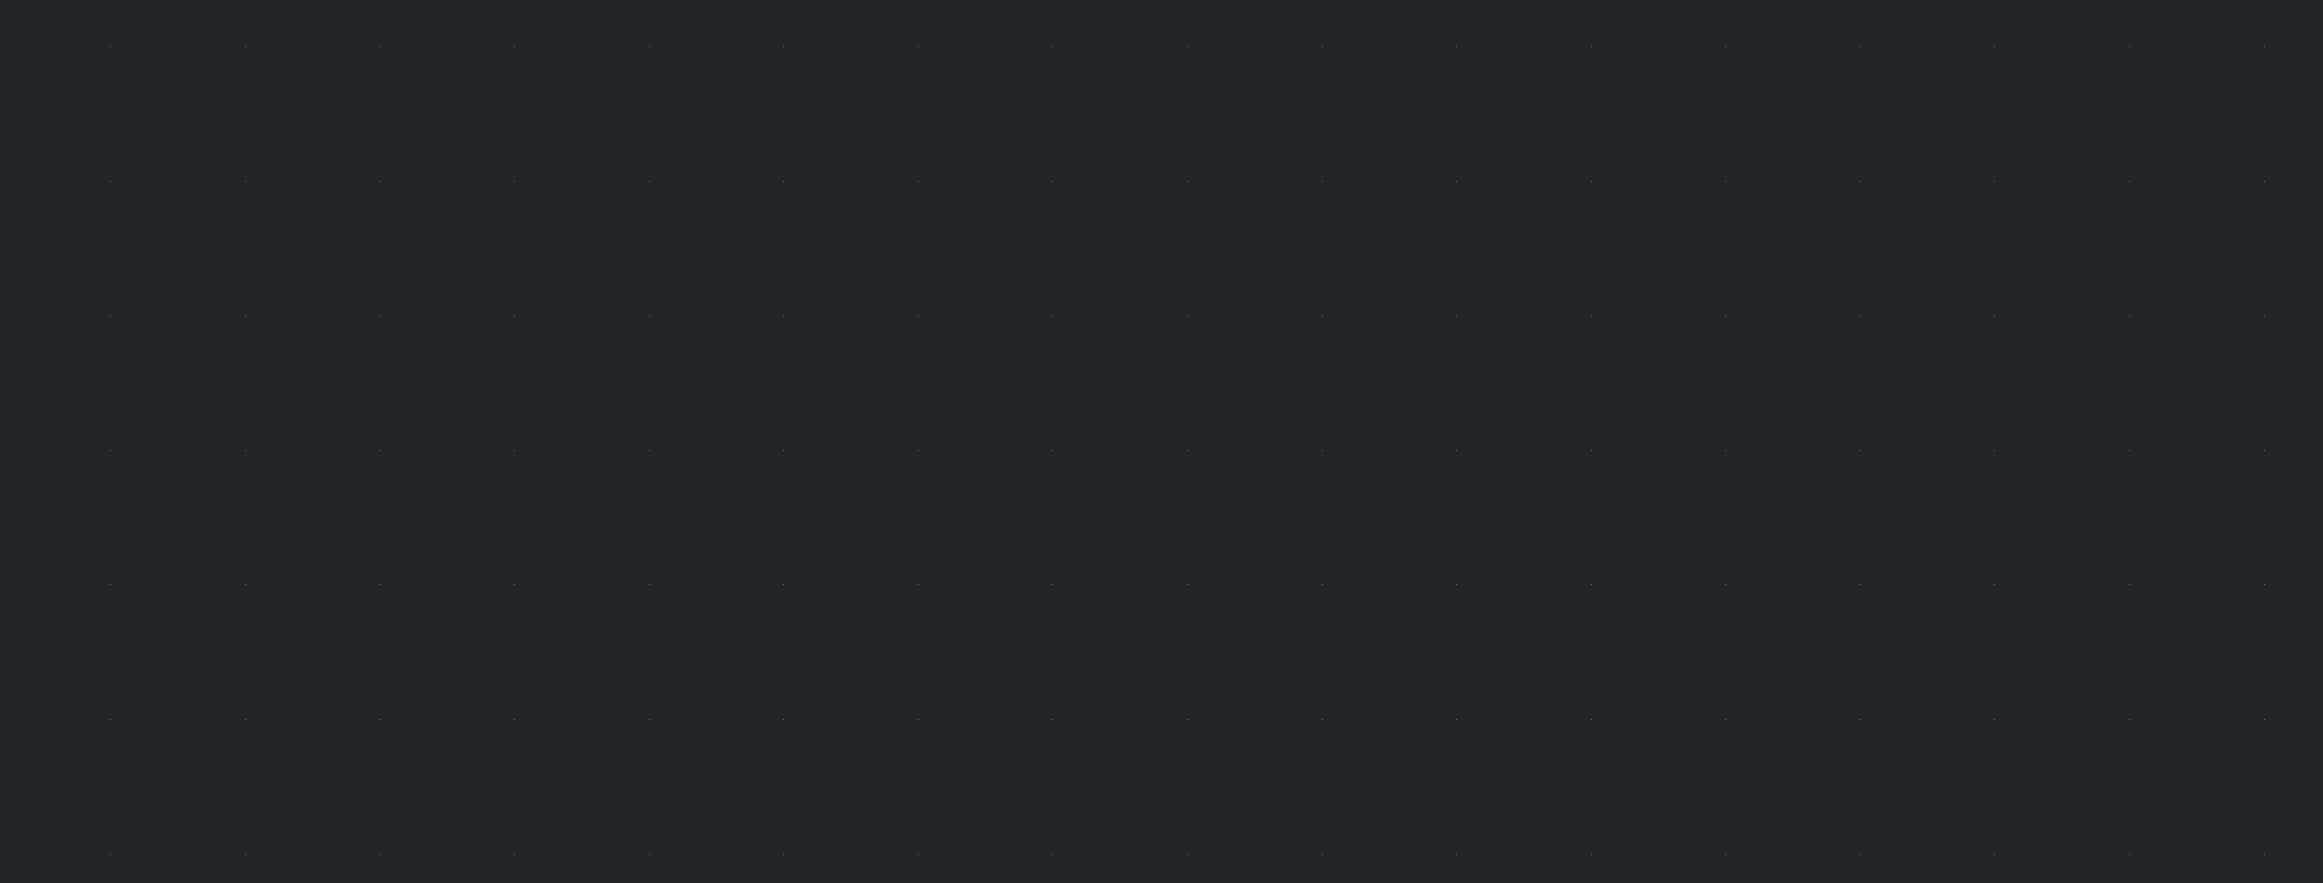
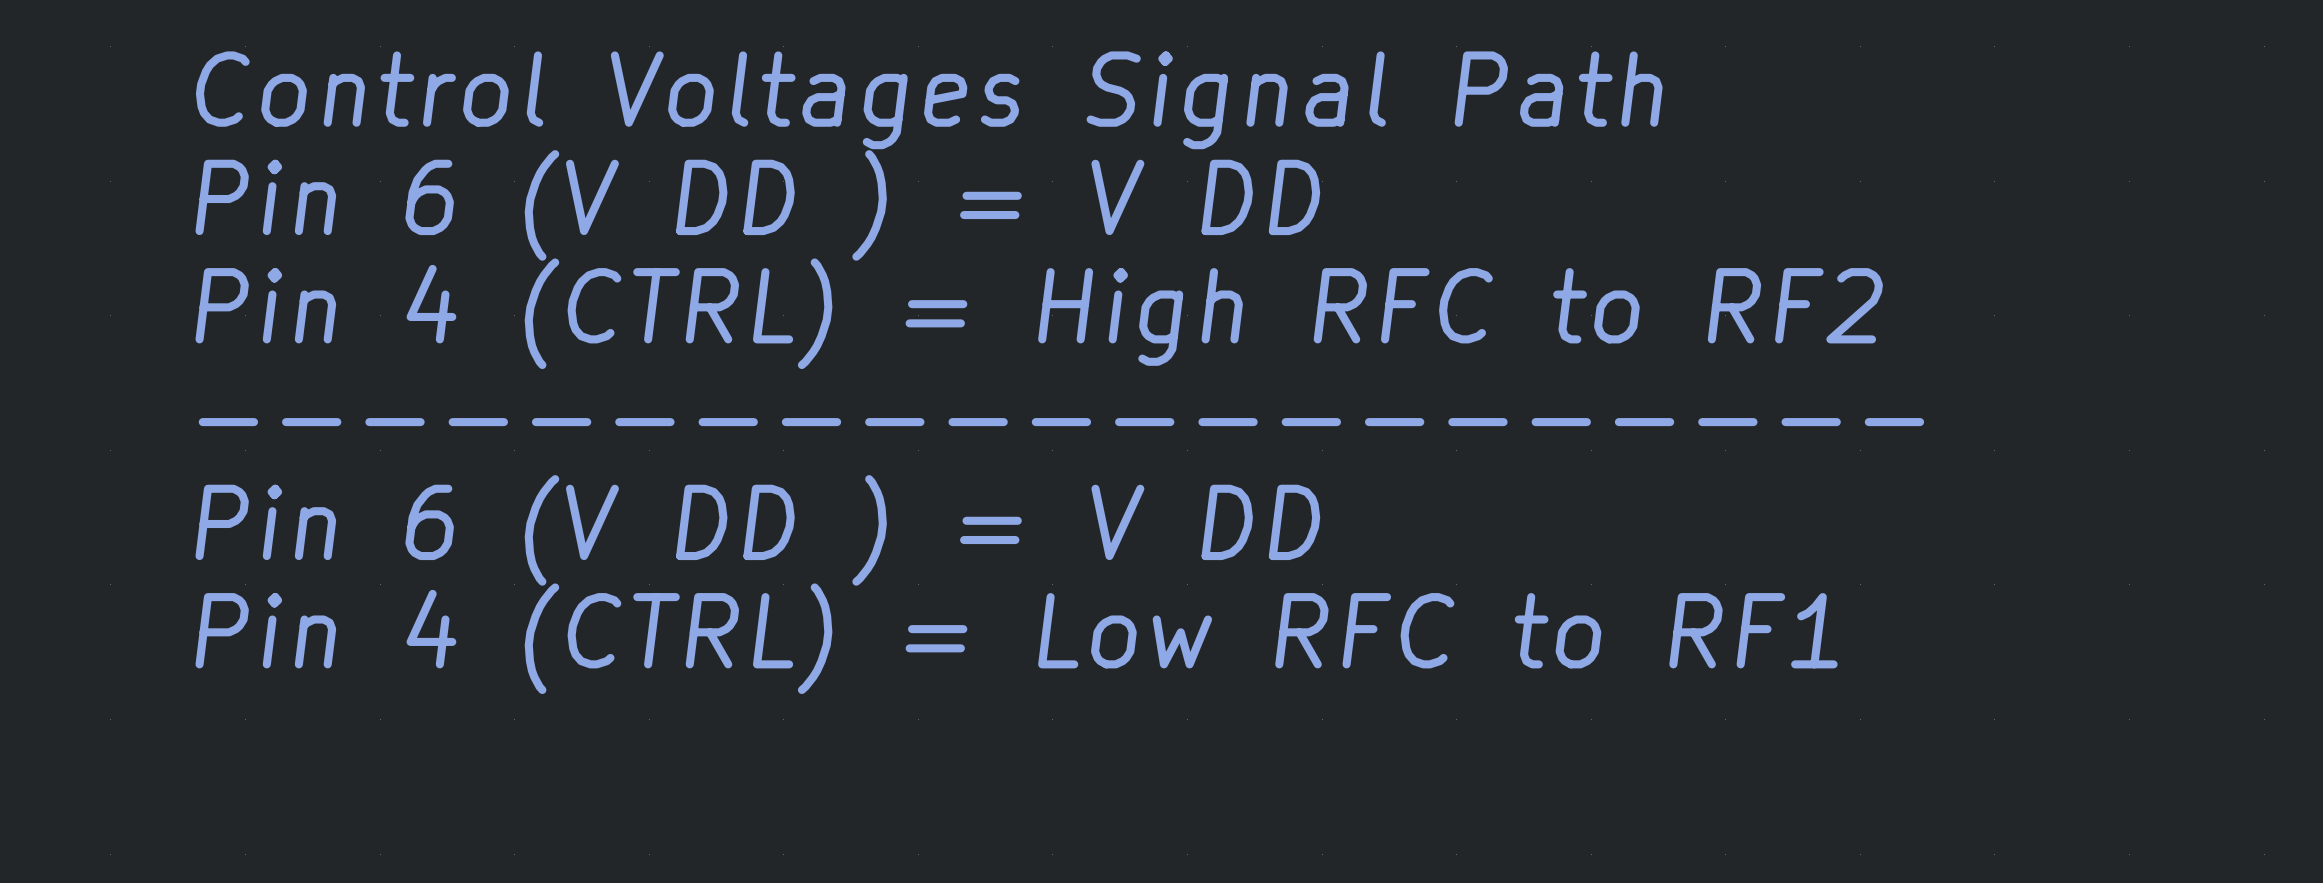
text: none -> Control Voltages Signal Path (929, 100)
text: none -> Pin 6 (V DD ) = V DD (757, 205)
text: none -> Pin 4 (CTRL) = High RFC to RF2 (1039, 313)
text: none -> --------------------- (1061, 422)
text: none -> Pin 6 (V DD ) = V DD (757, 530)
text: none -> Pin 4 (CTRL) = Low RFC to RF1 (1016, 638)

